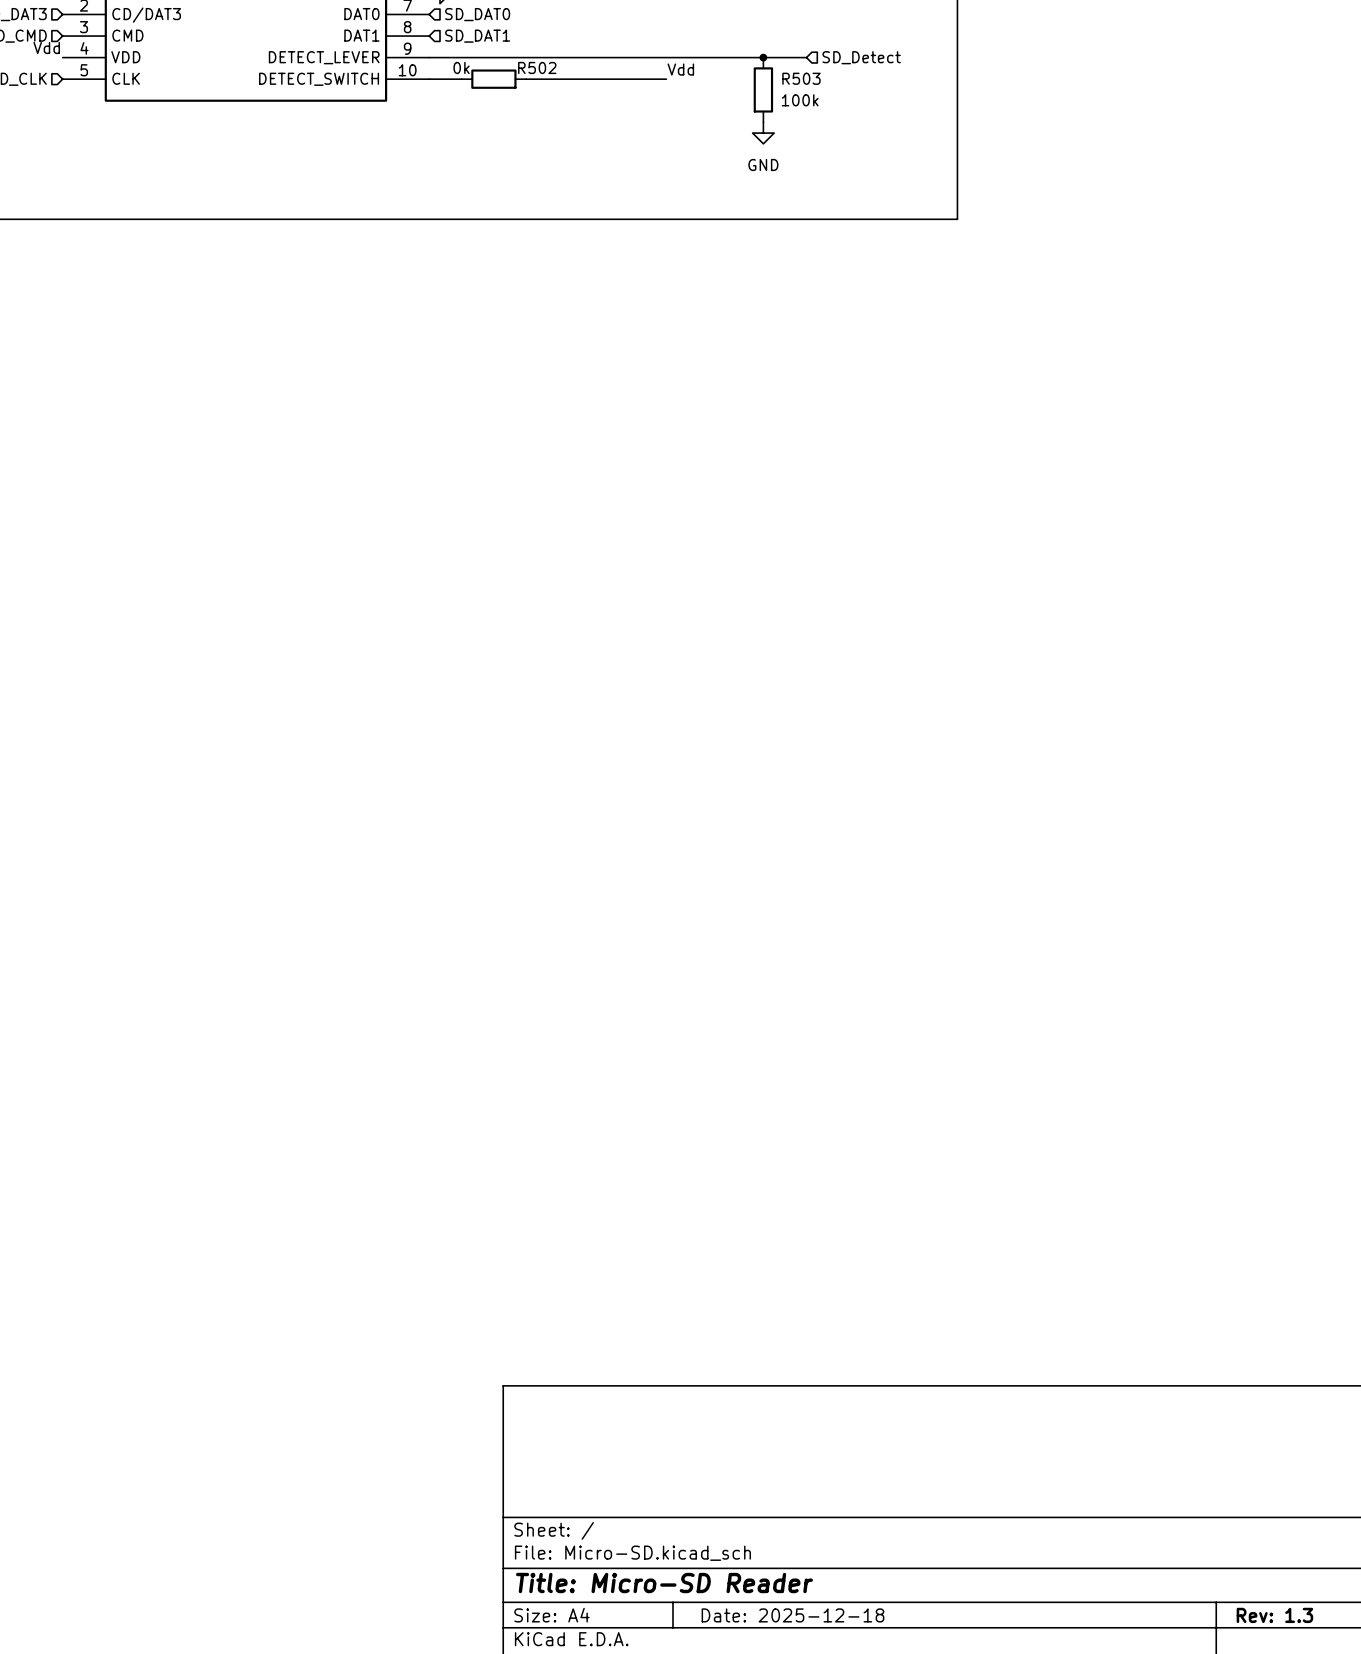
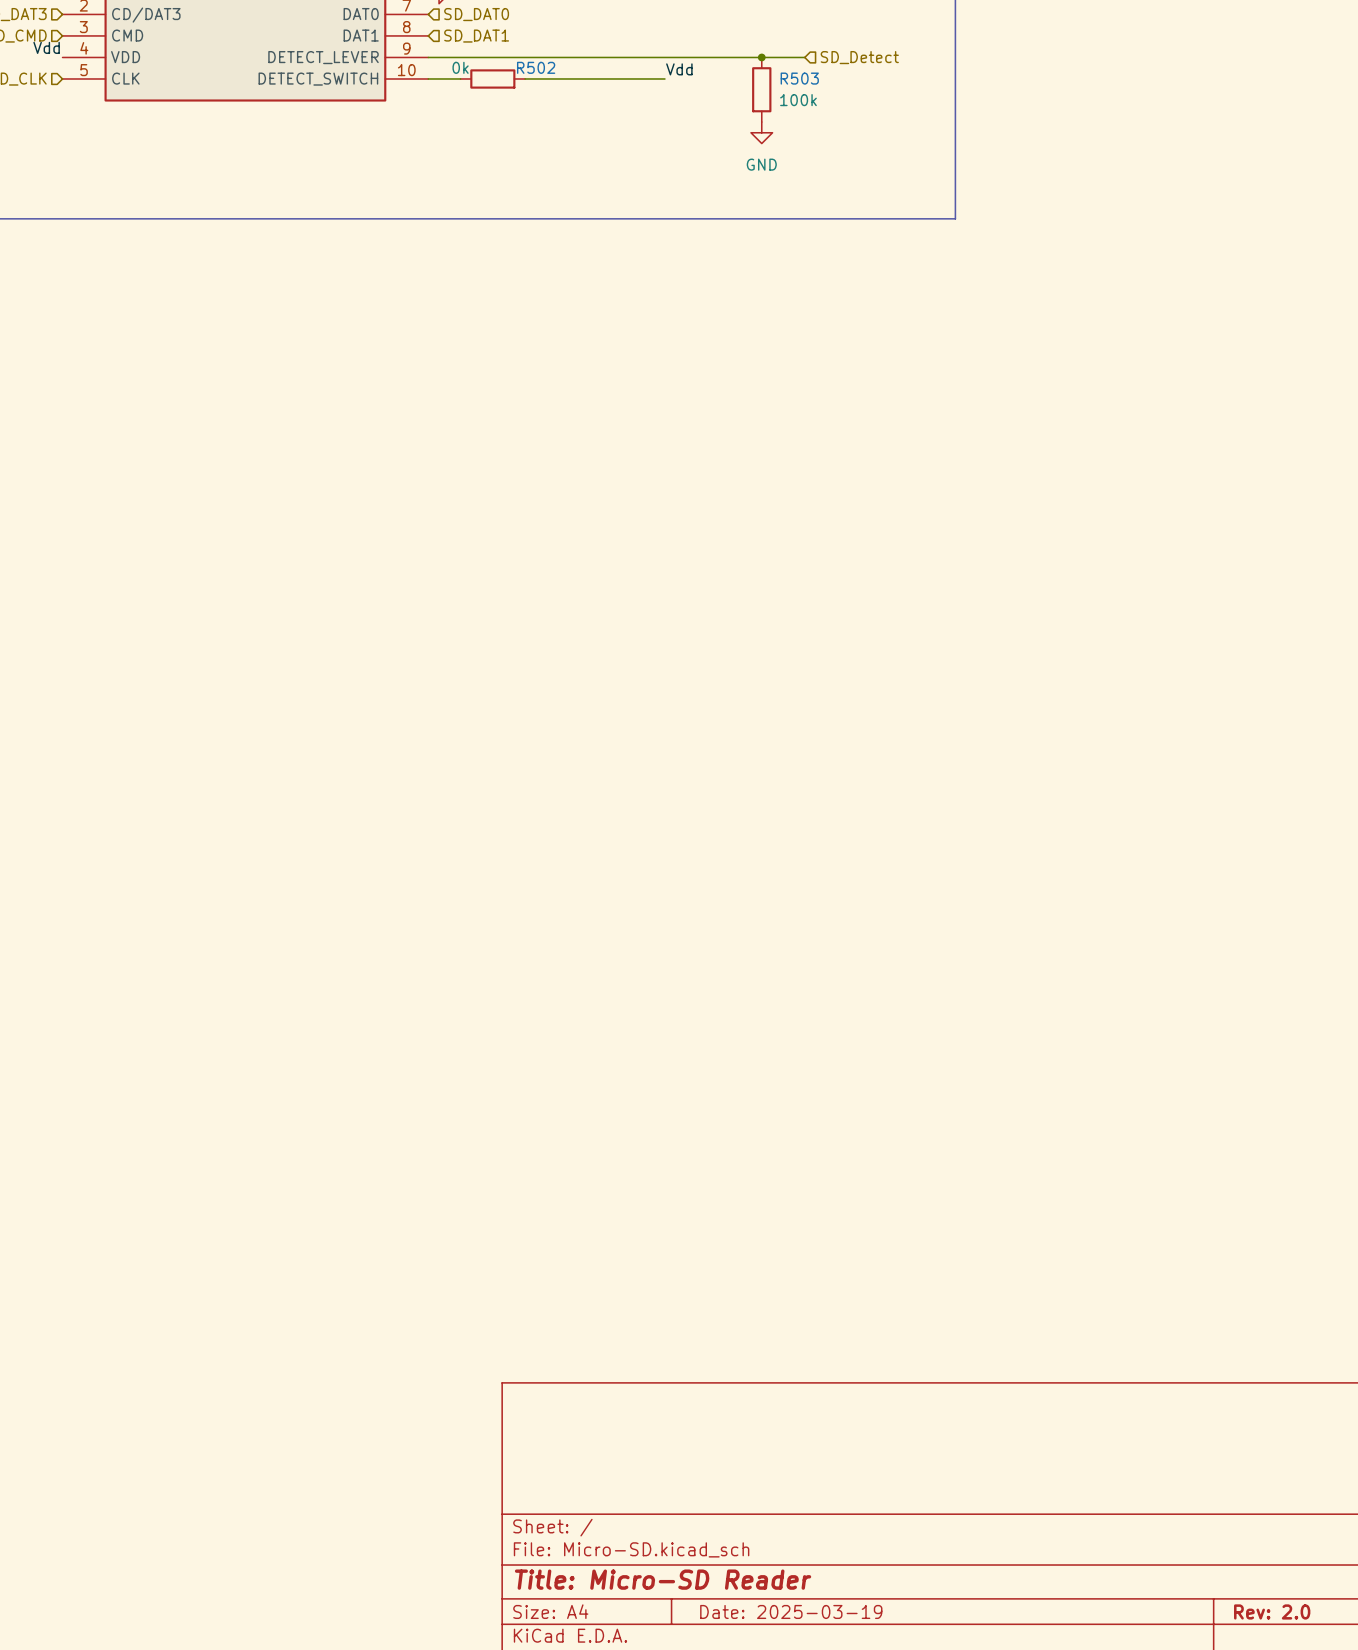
title block: Date: 2025-12-18 (792, 1615) -> Date: 2025-03-19 (791, 1611)
title block: Rev: 1.3 (1274, 1615) -> Rev: 2.0 (1272, 1611)

